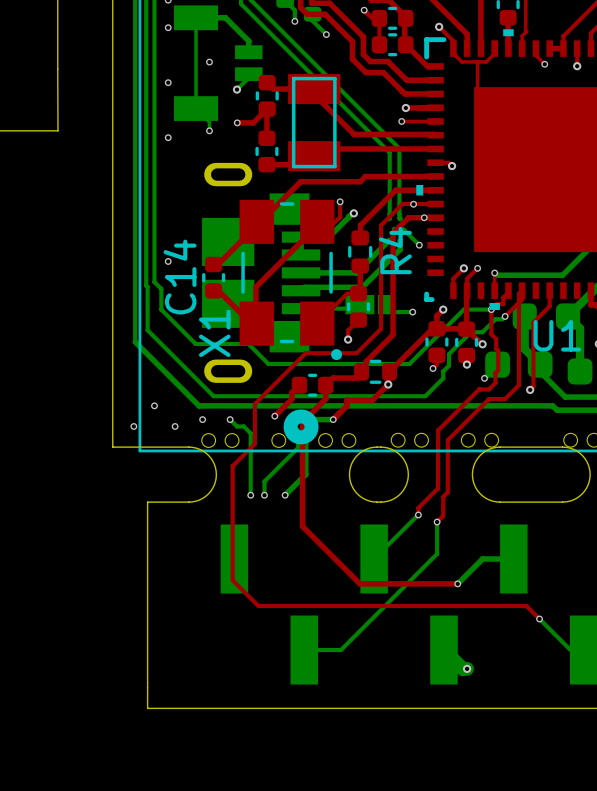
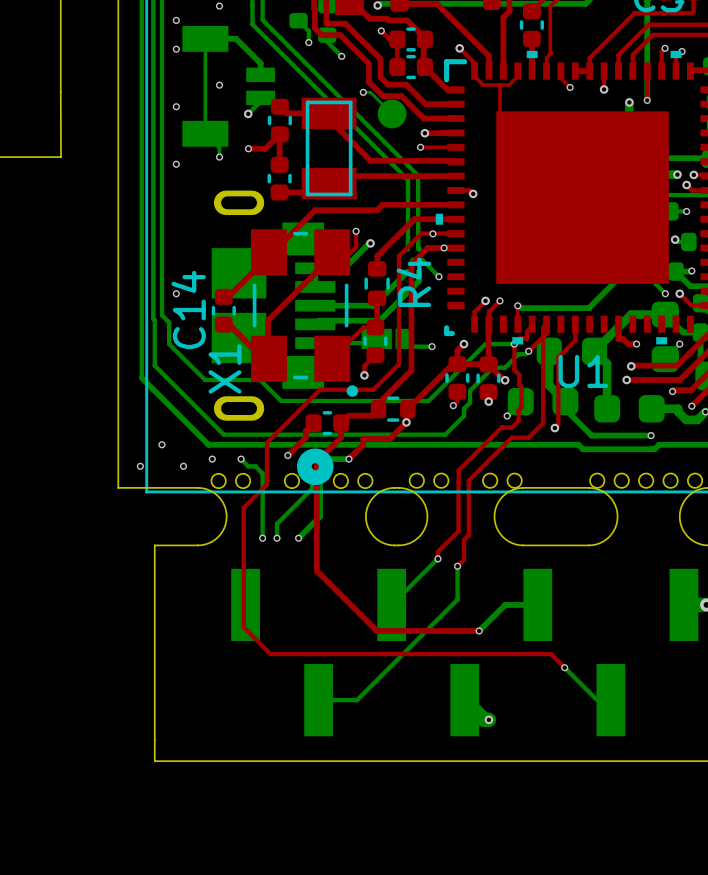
bottom track: none -> (363, 92) (370, 92) (392, 113)
via: none -> (363, 92)
part: none -> (392, 113)

